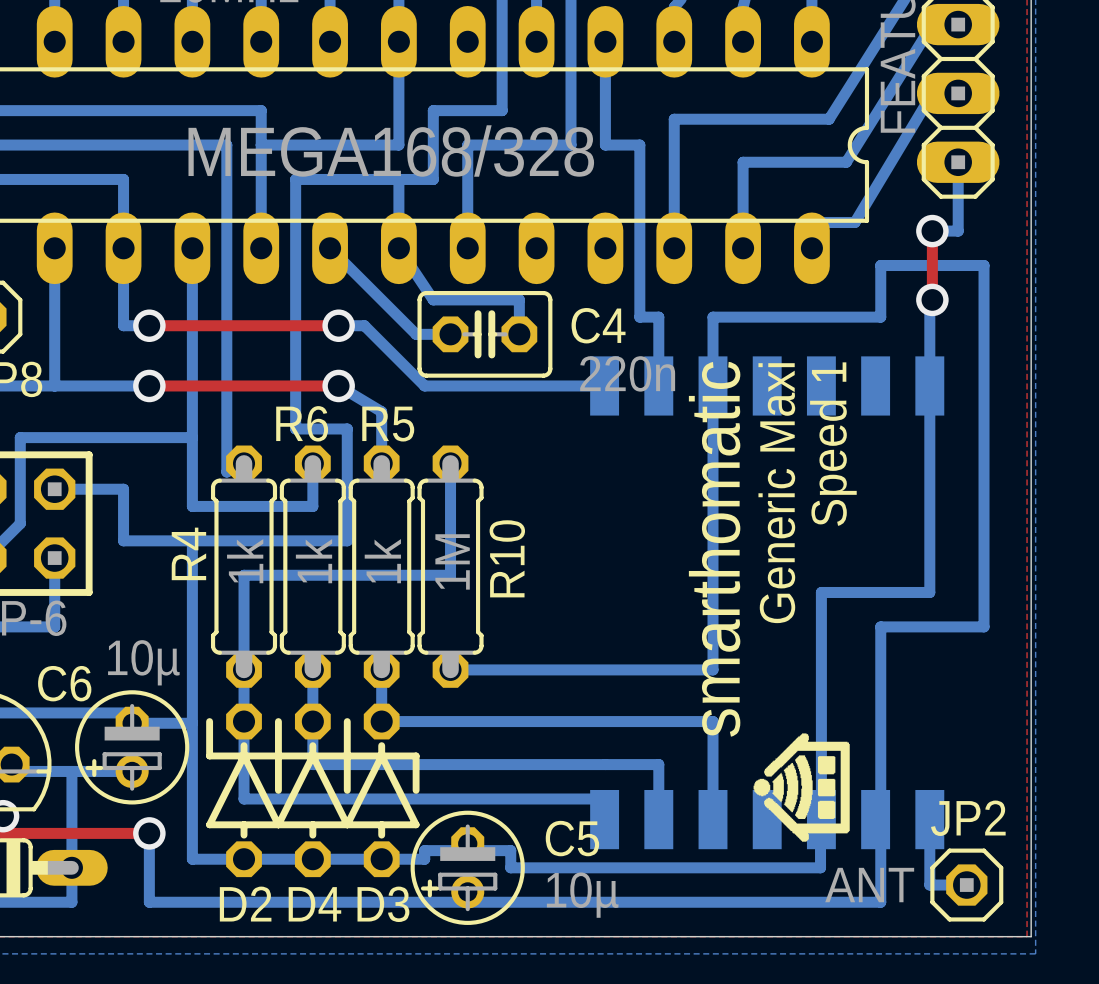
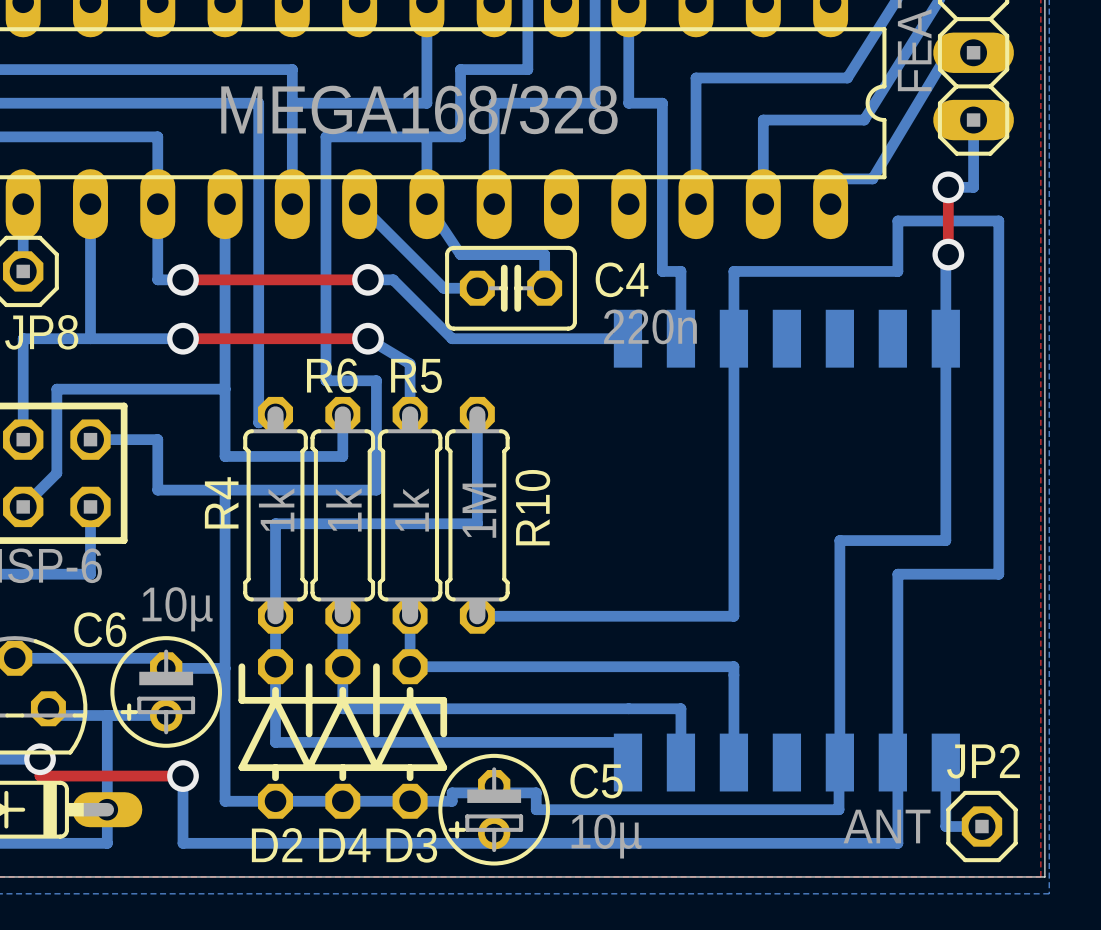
text: Speed 1 (833, 444) -> none
text: Generic Maxi (776, 493) -> none
text: smarthomatic (714, 549) -> none
drawing: [753, 733, 850, 842] -> none

